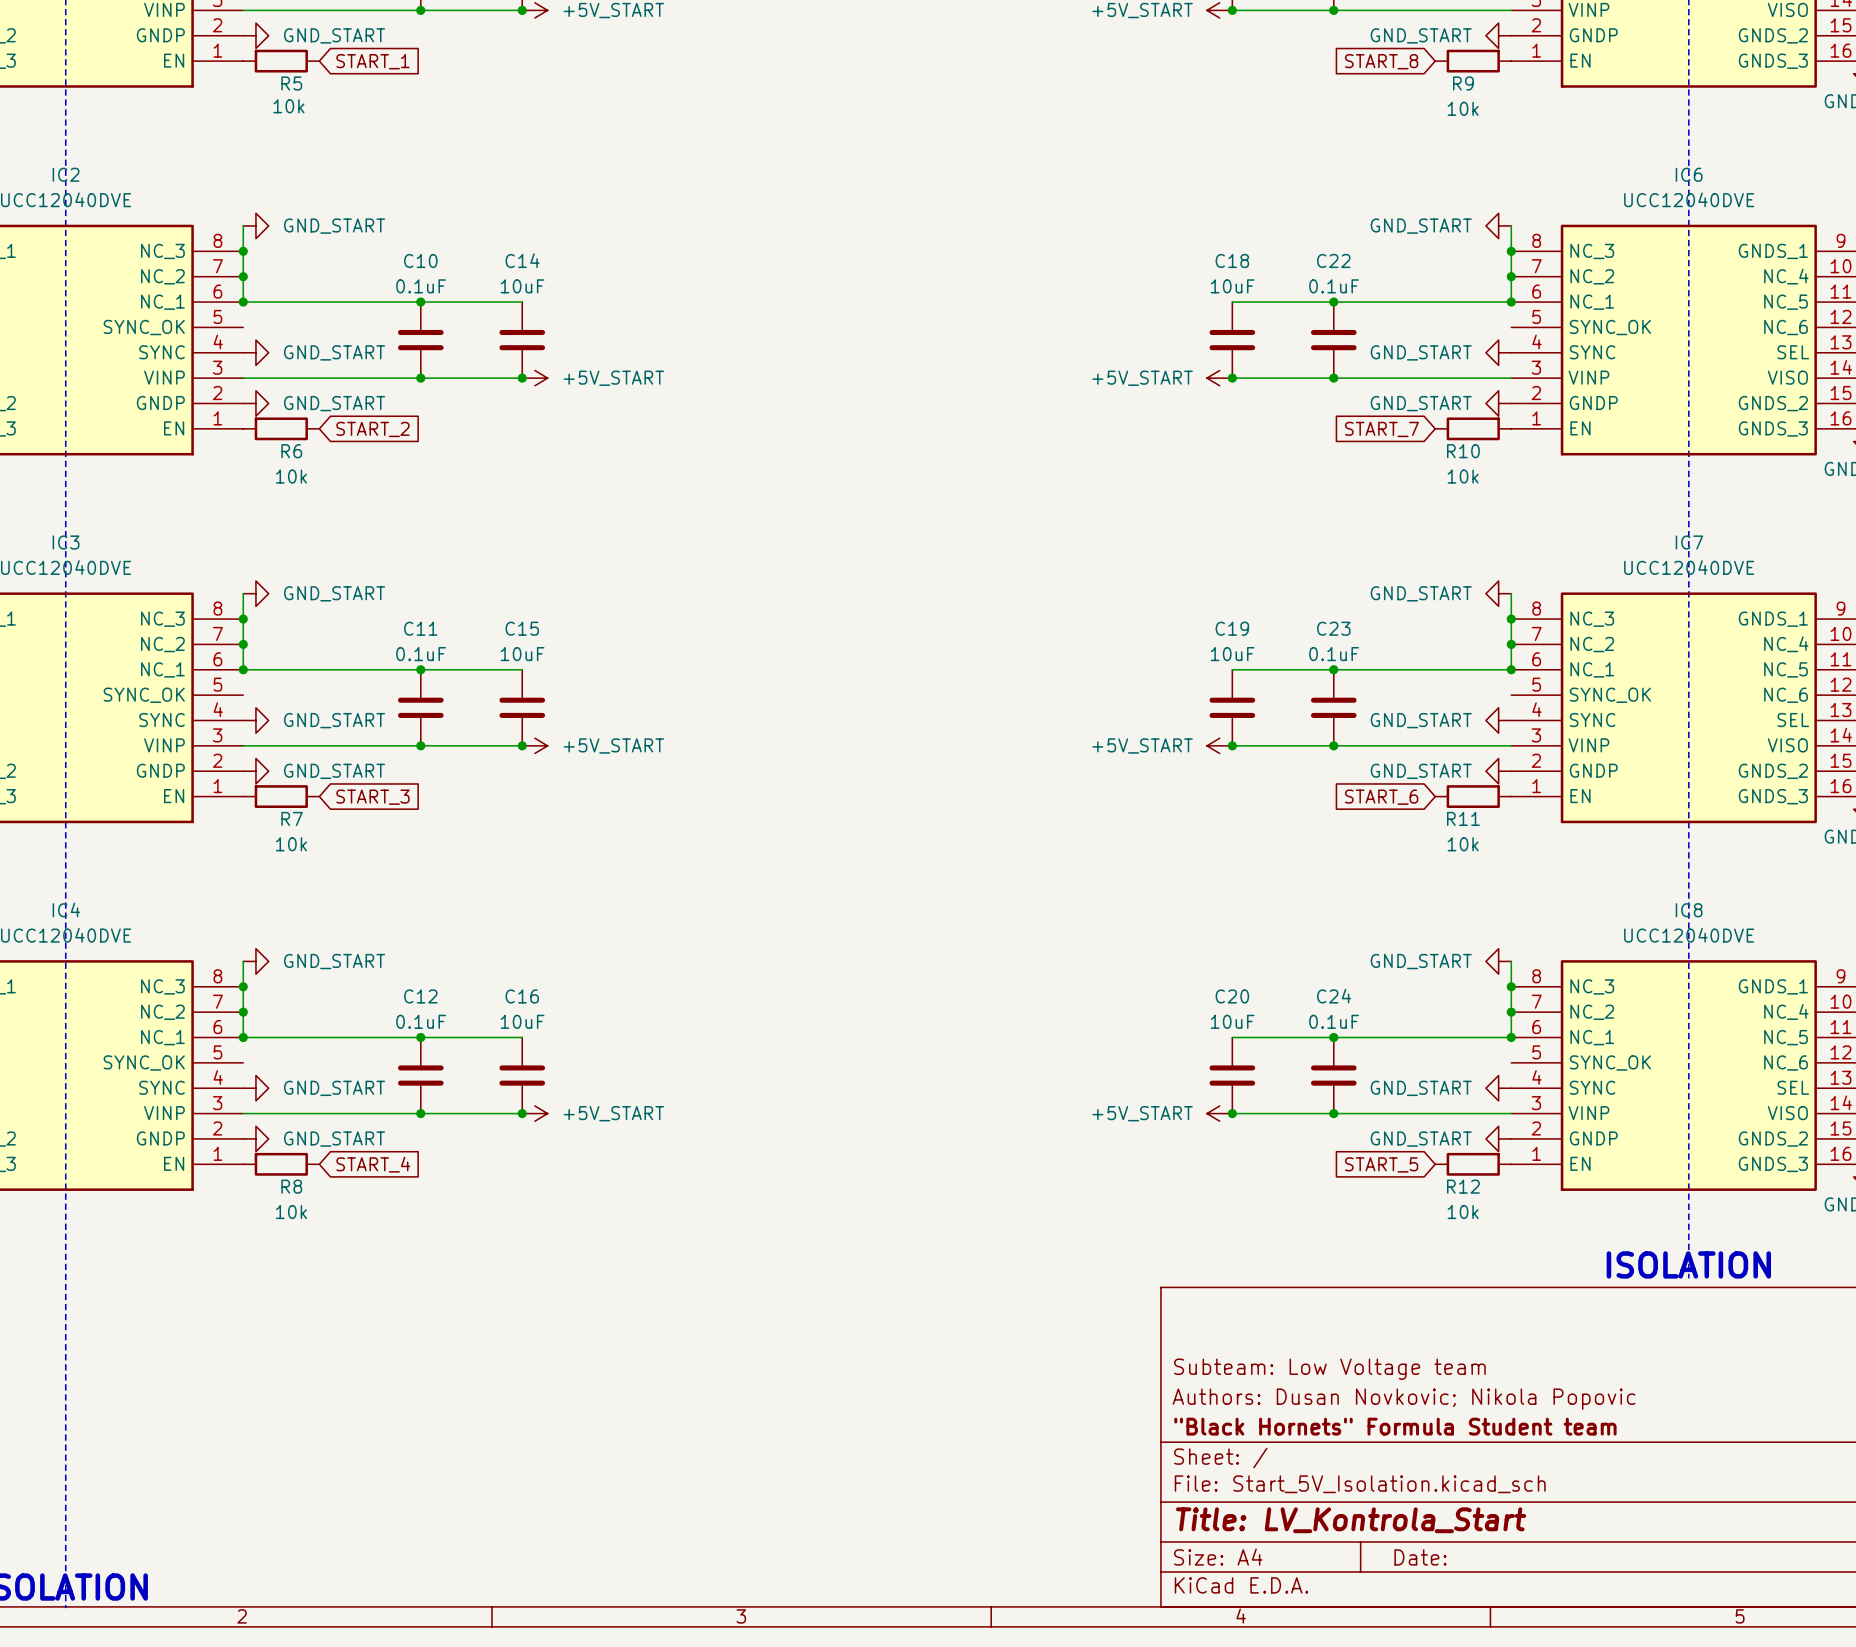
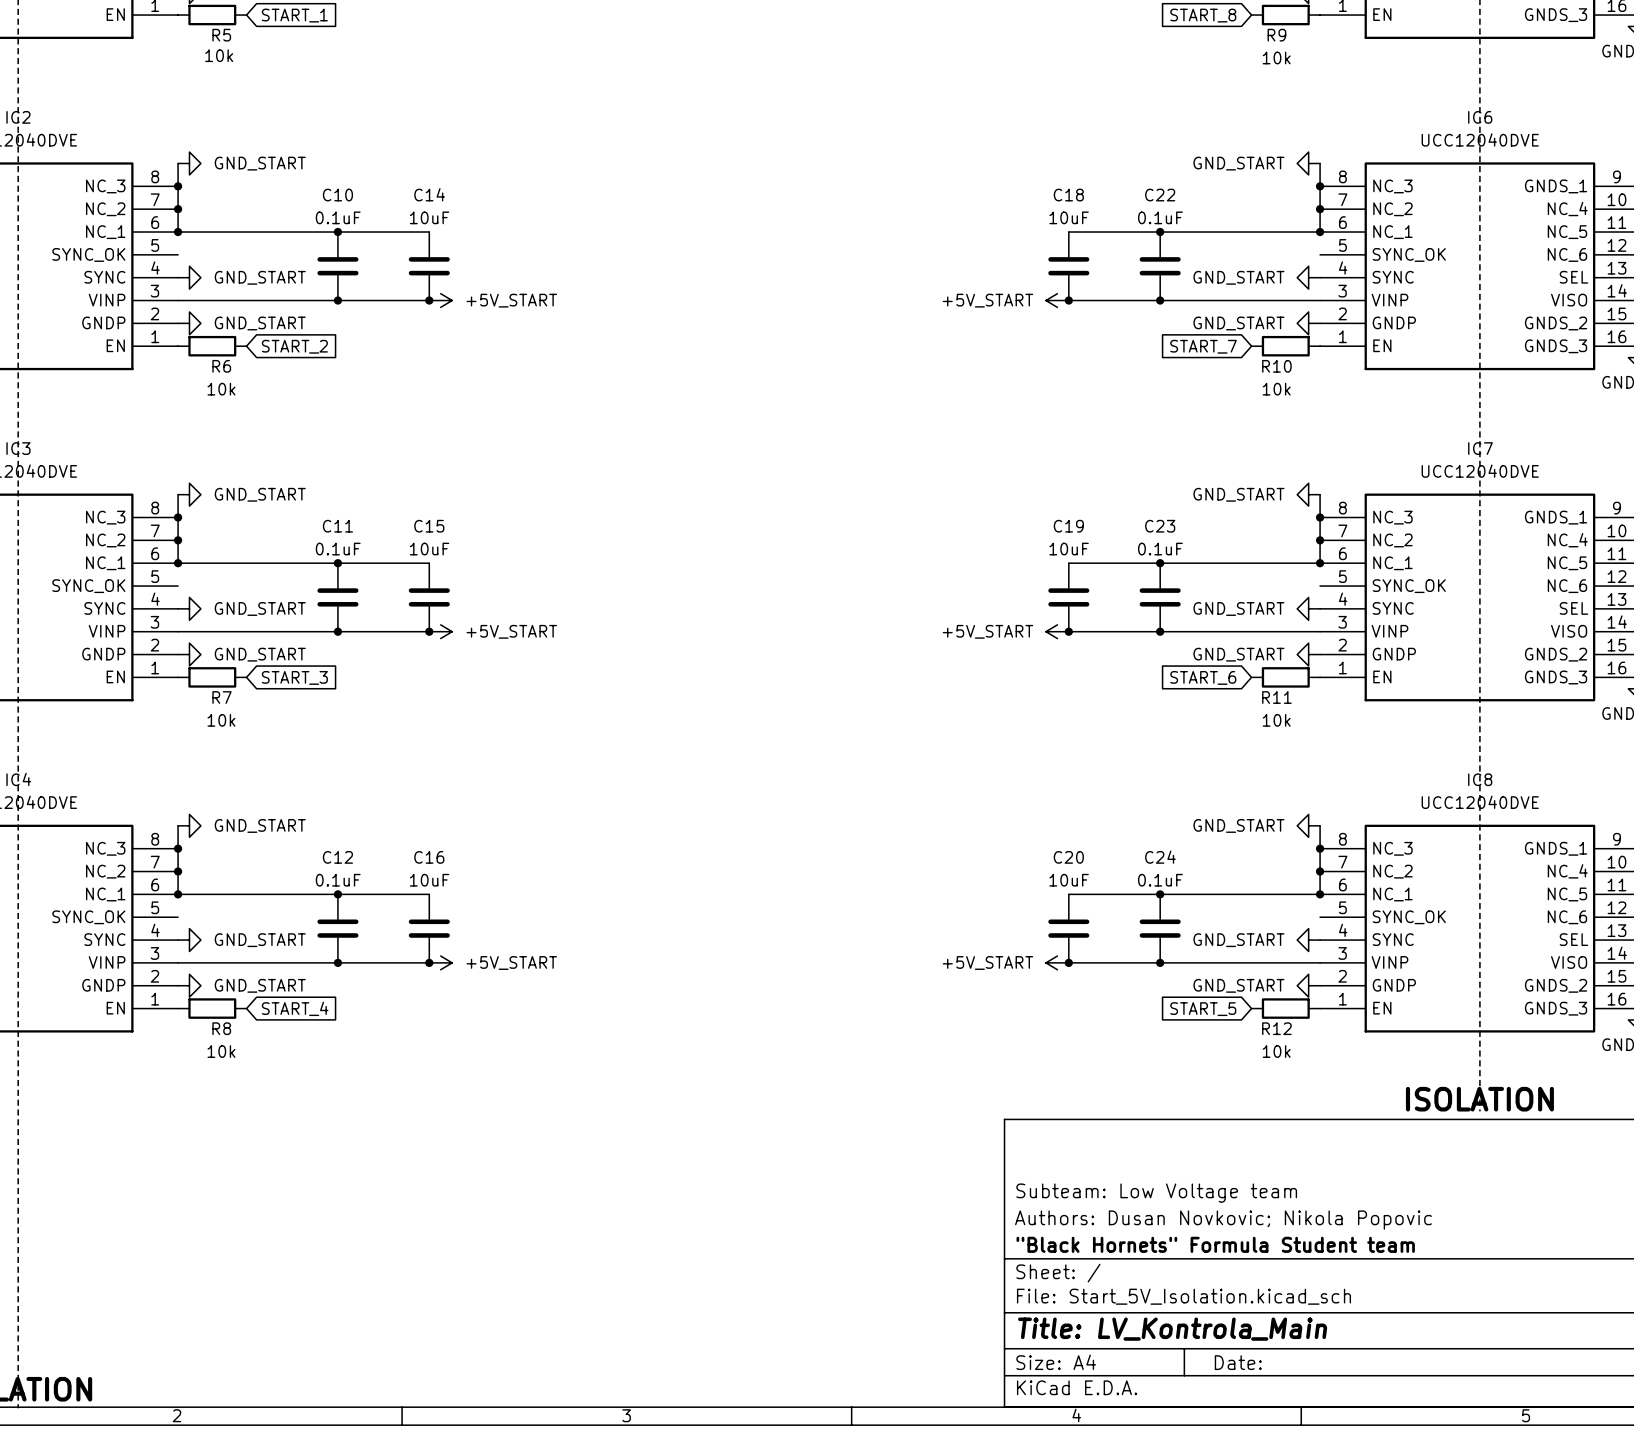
title block: Title: LV_Kontrola_Start (1351, 1520) -> Title: LV_Kontrola_Main (1172, 1329)

